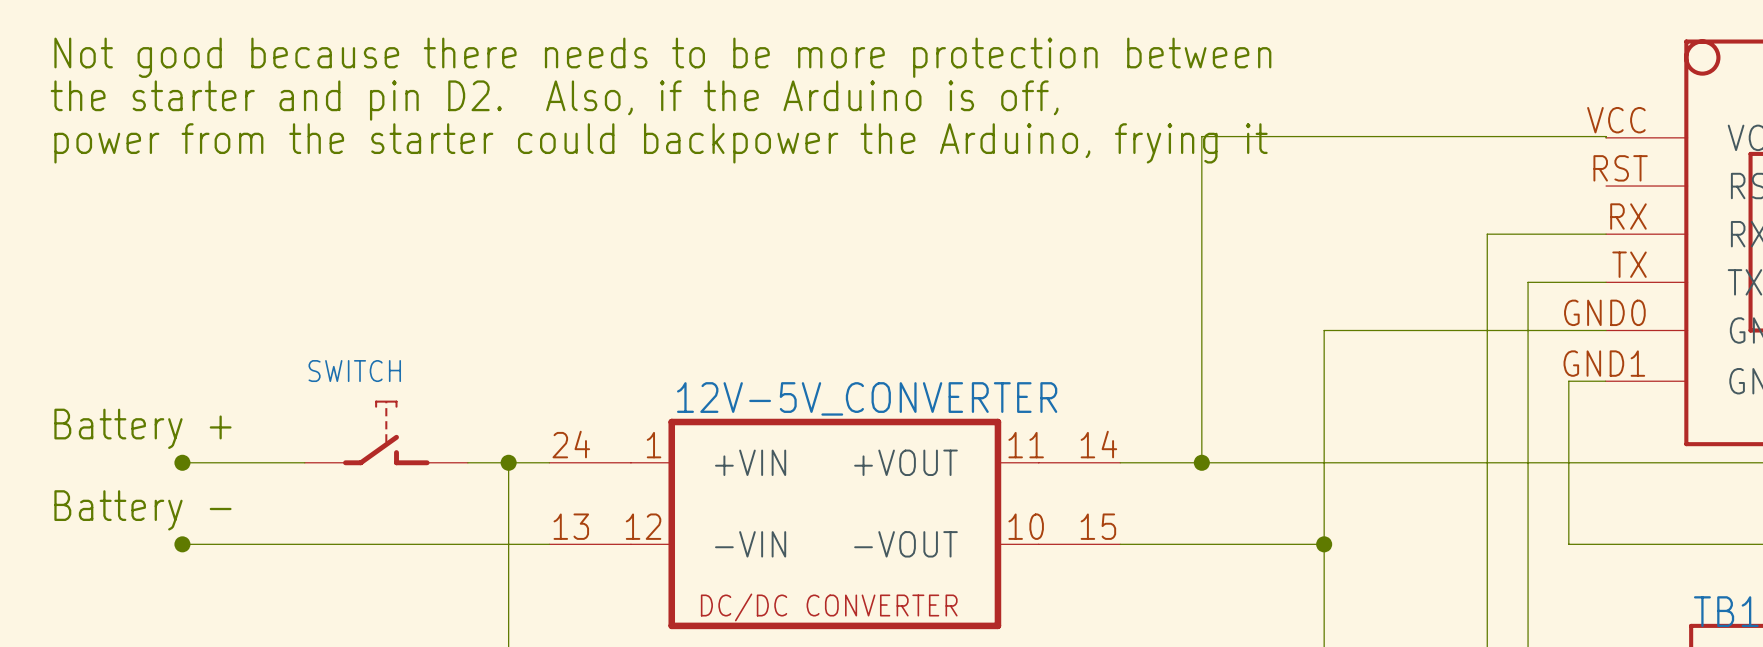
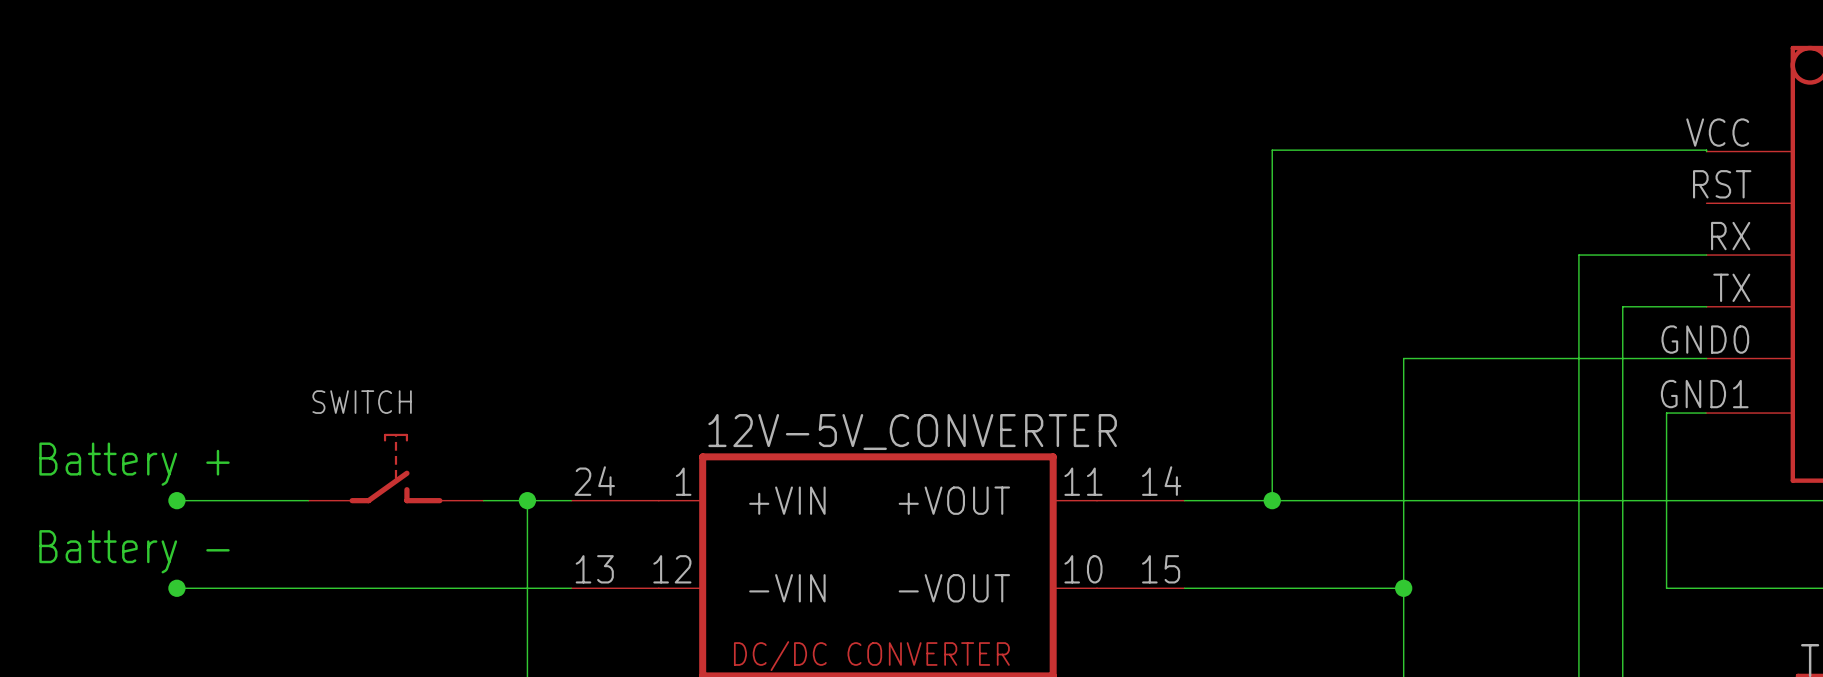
text: Not good because there needs to be more protection between (662, 57) -> none
text: the starter and pin D2. Also, if the Arduino is off, (554, 100) -> none
text: power from the starter could backpower the Arduino, frying it (661, 143) -> none

